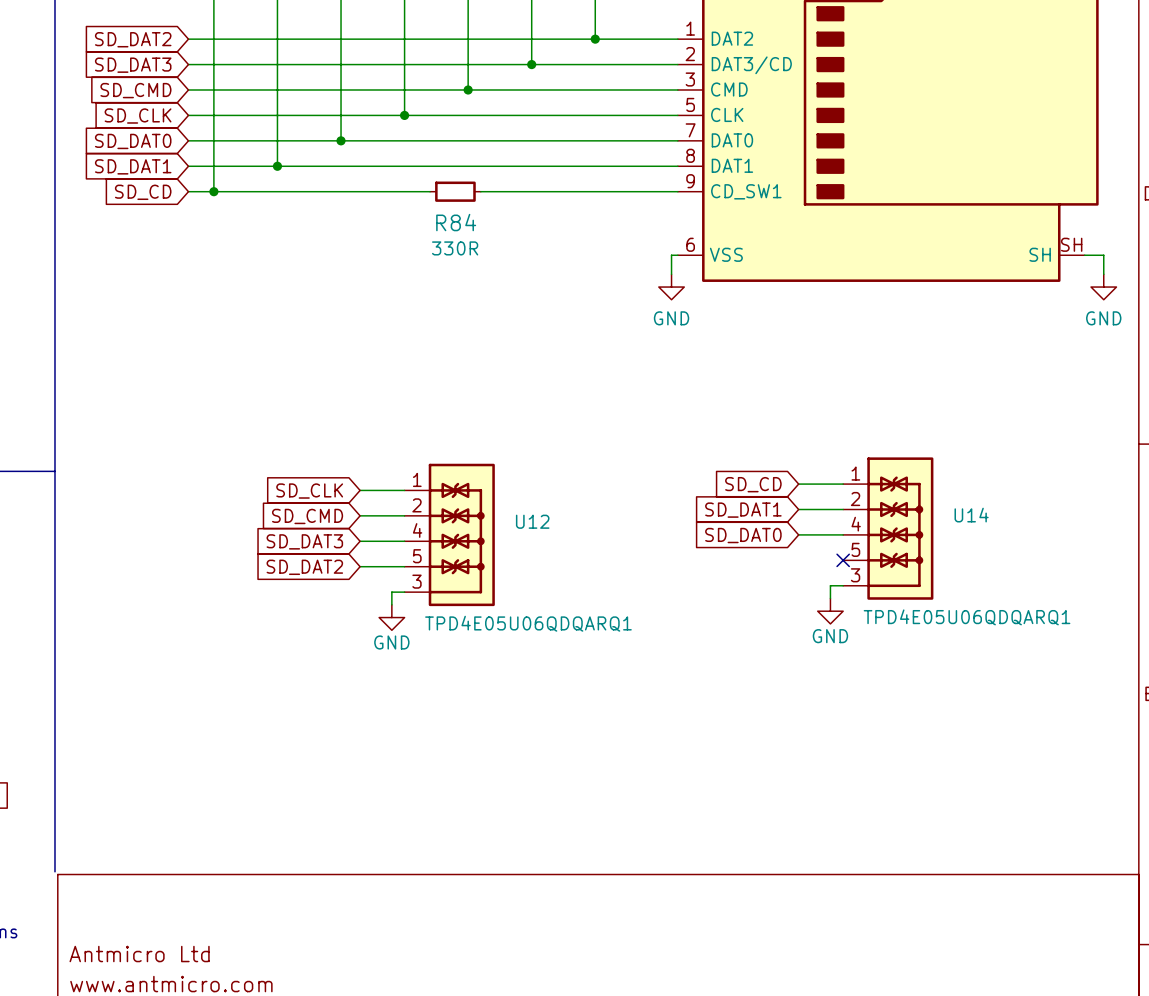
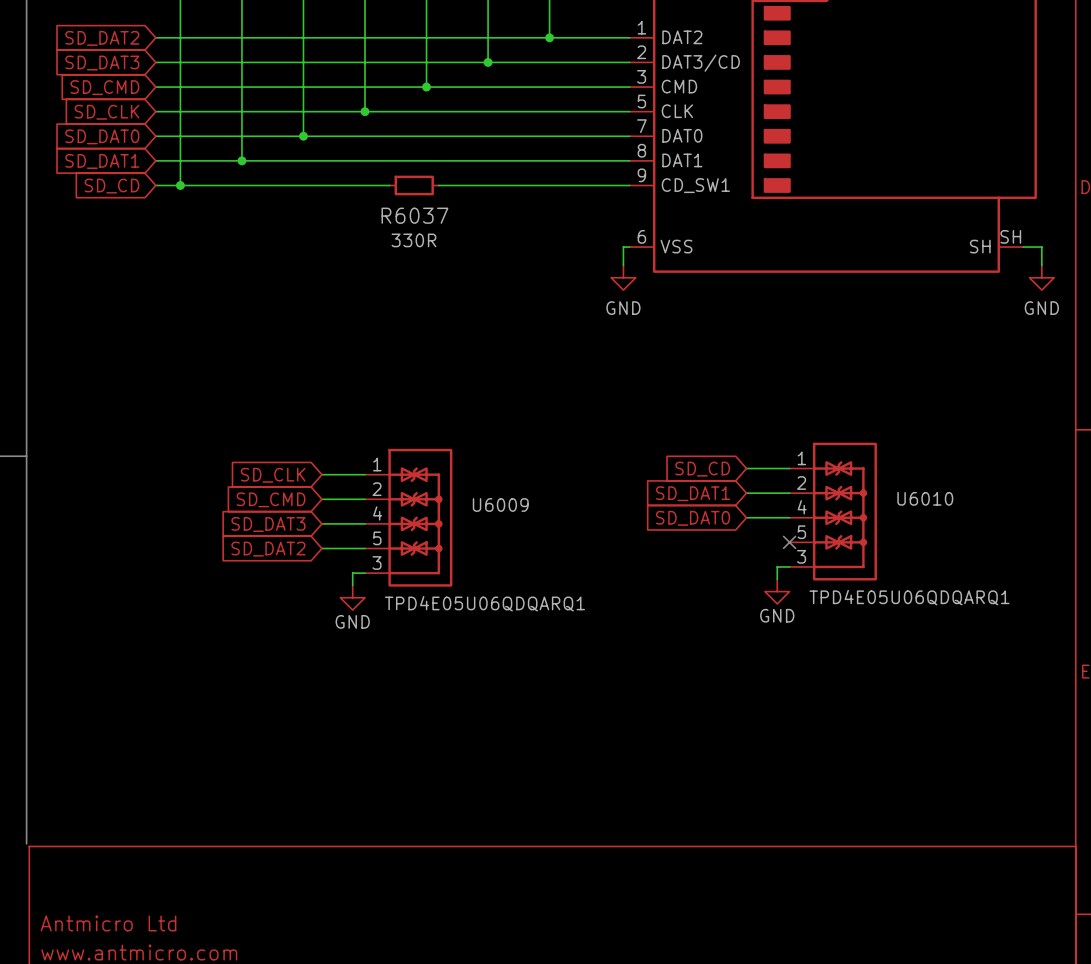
R84 name: R84 (456, 222) -> R6037 (414, 215)
U14 name: U14 (971, 515) -> U6010 (925, 498)
U12 name: U12 (532, 521) -> U6009 (500, 504)

